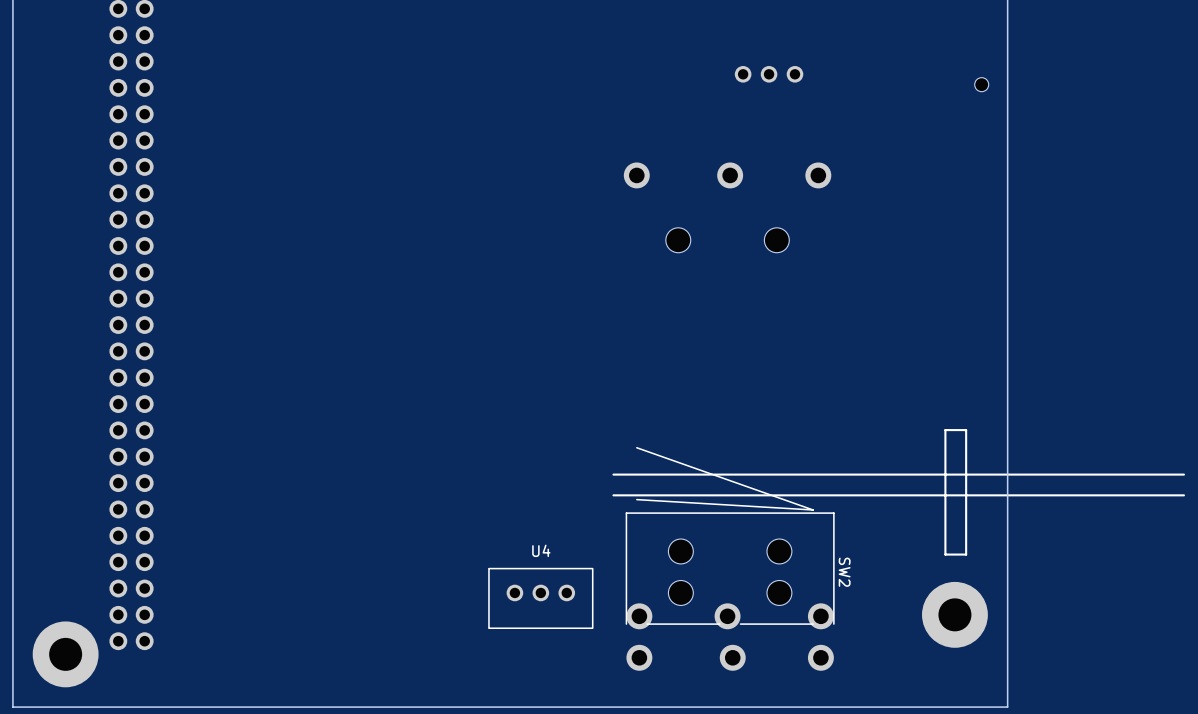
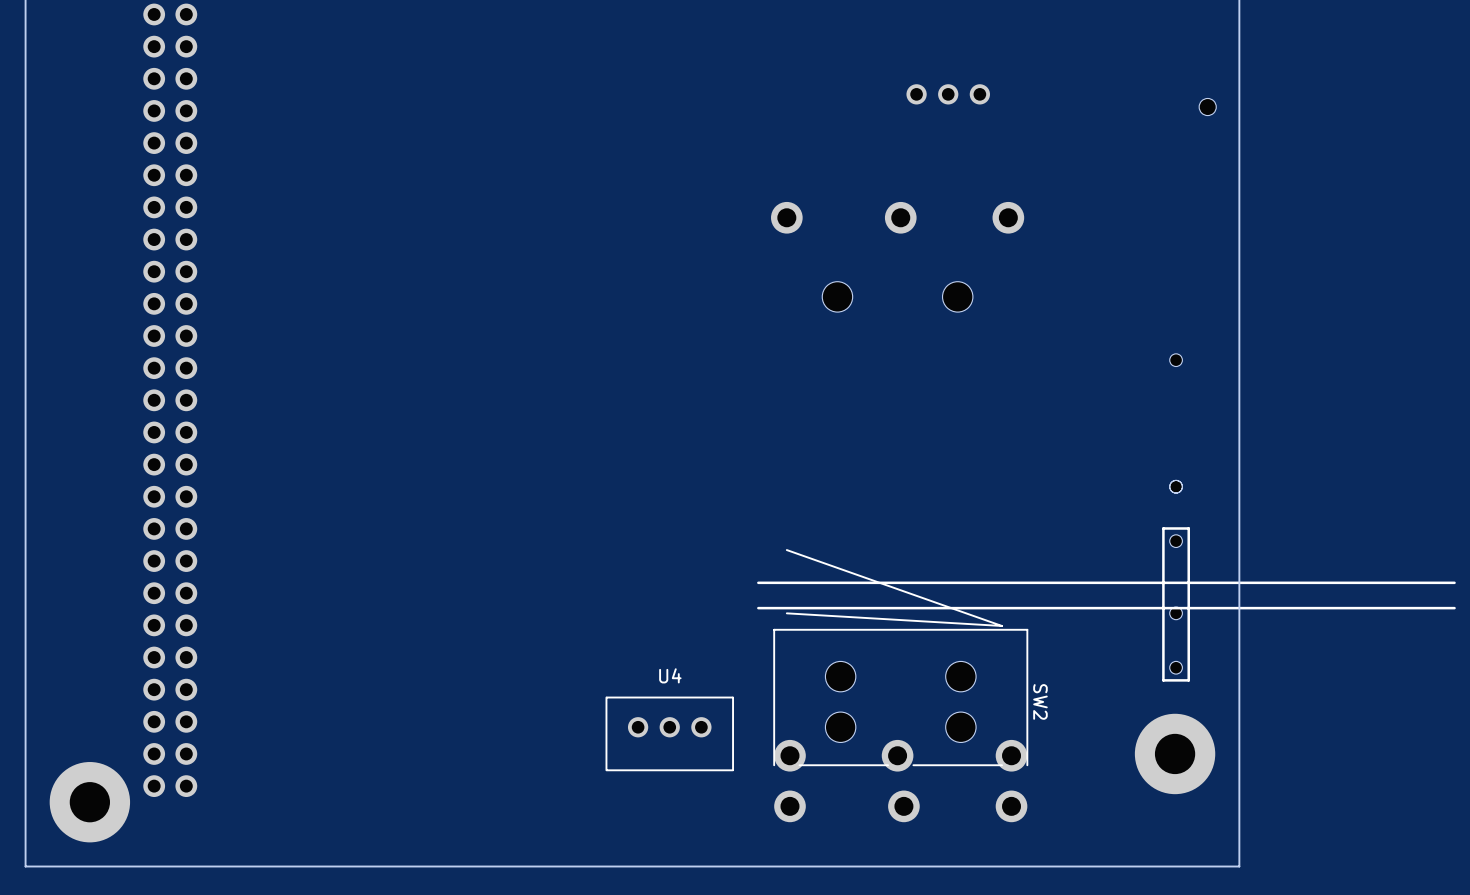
part: none -> (1176, 360)
part: none -> (1176, 486)
part: none -> (1176, 541)
part: none -> (1176, 613)
part: none -> (1176, 667)

